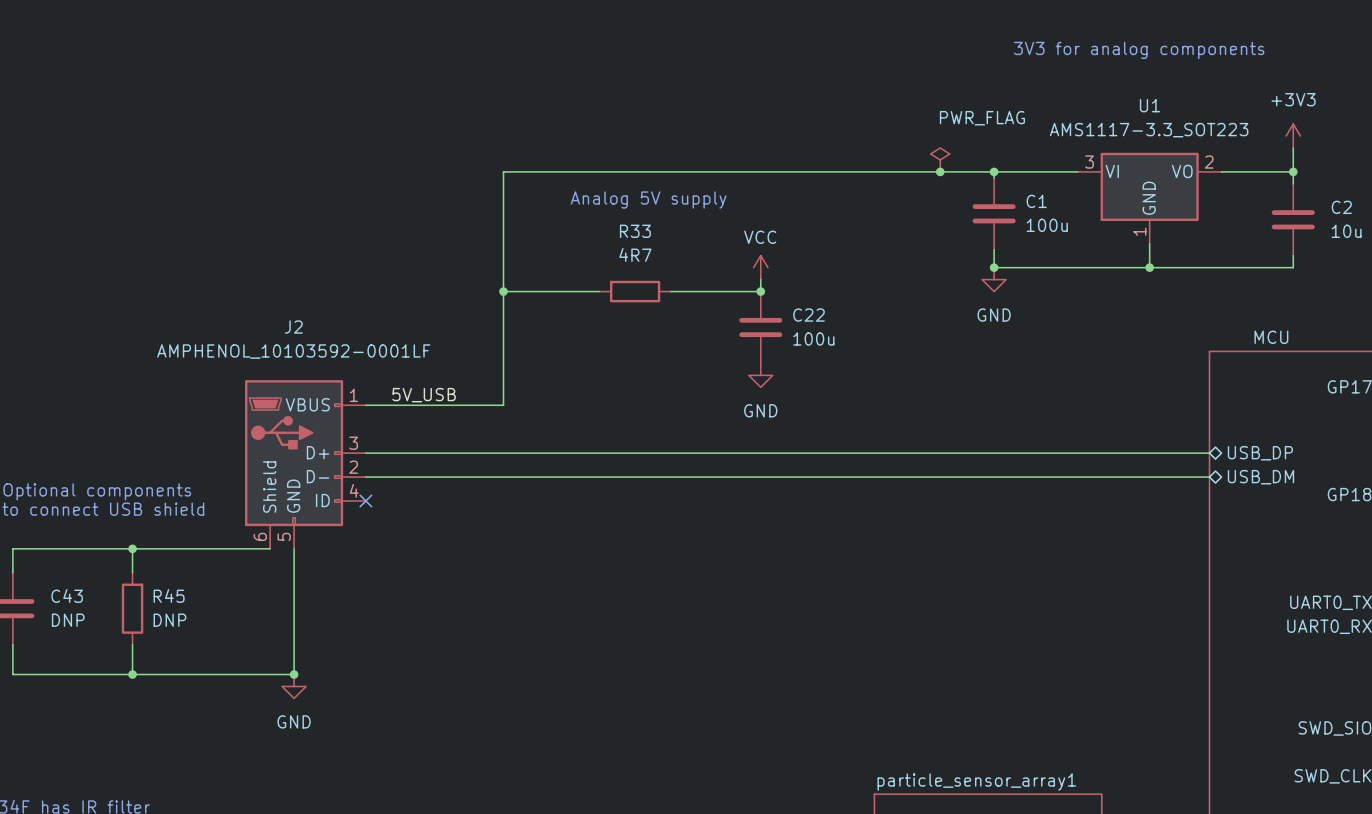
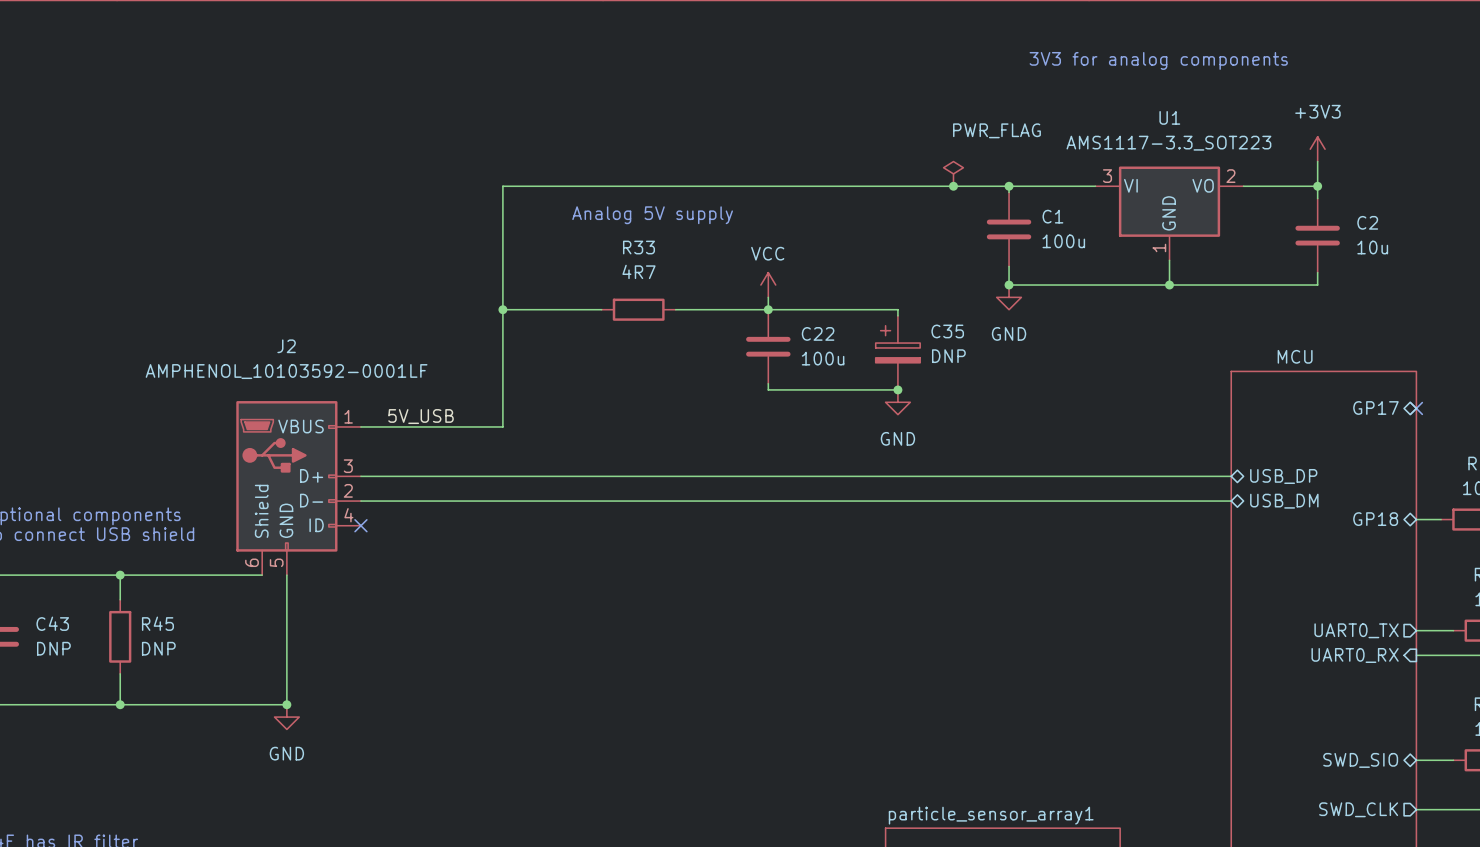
wire: none -> (768, 309) (897, 309) (897, 315)
C35: none -> DNP (897, 352)
wire: none -> (768, 383) (768, 389) (897, 389)
junction: none -> (897, 389)
power symbol position: GND (760, 375) -> GND (897, 402)

